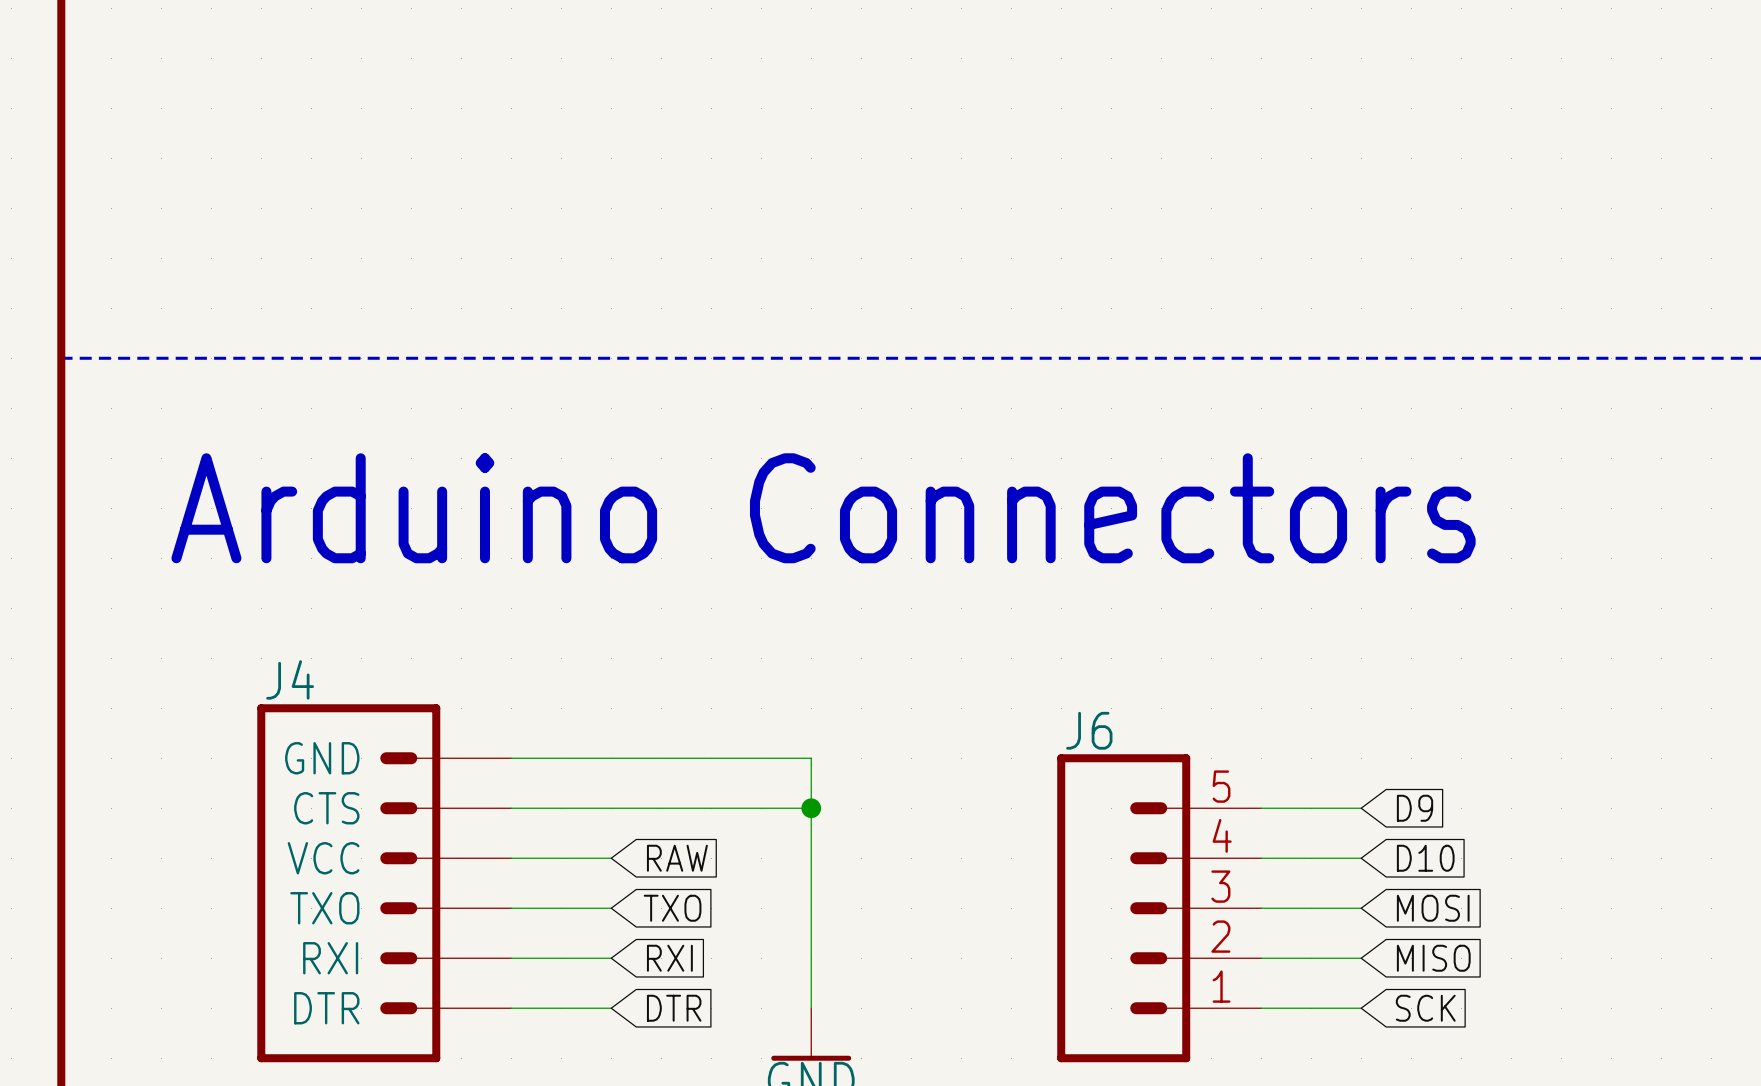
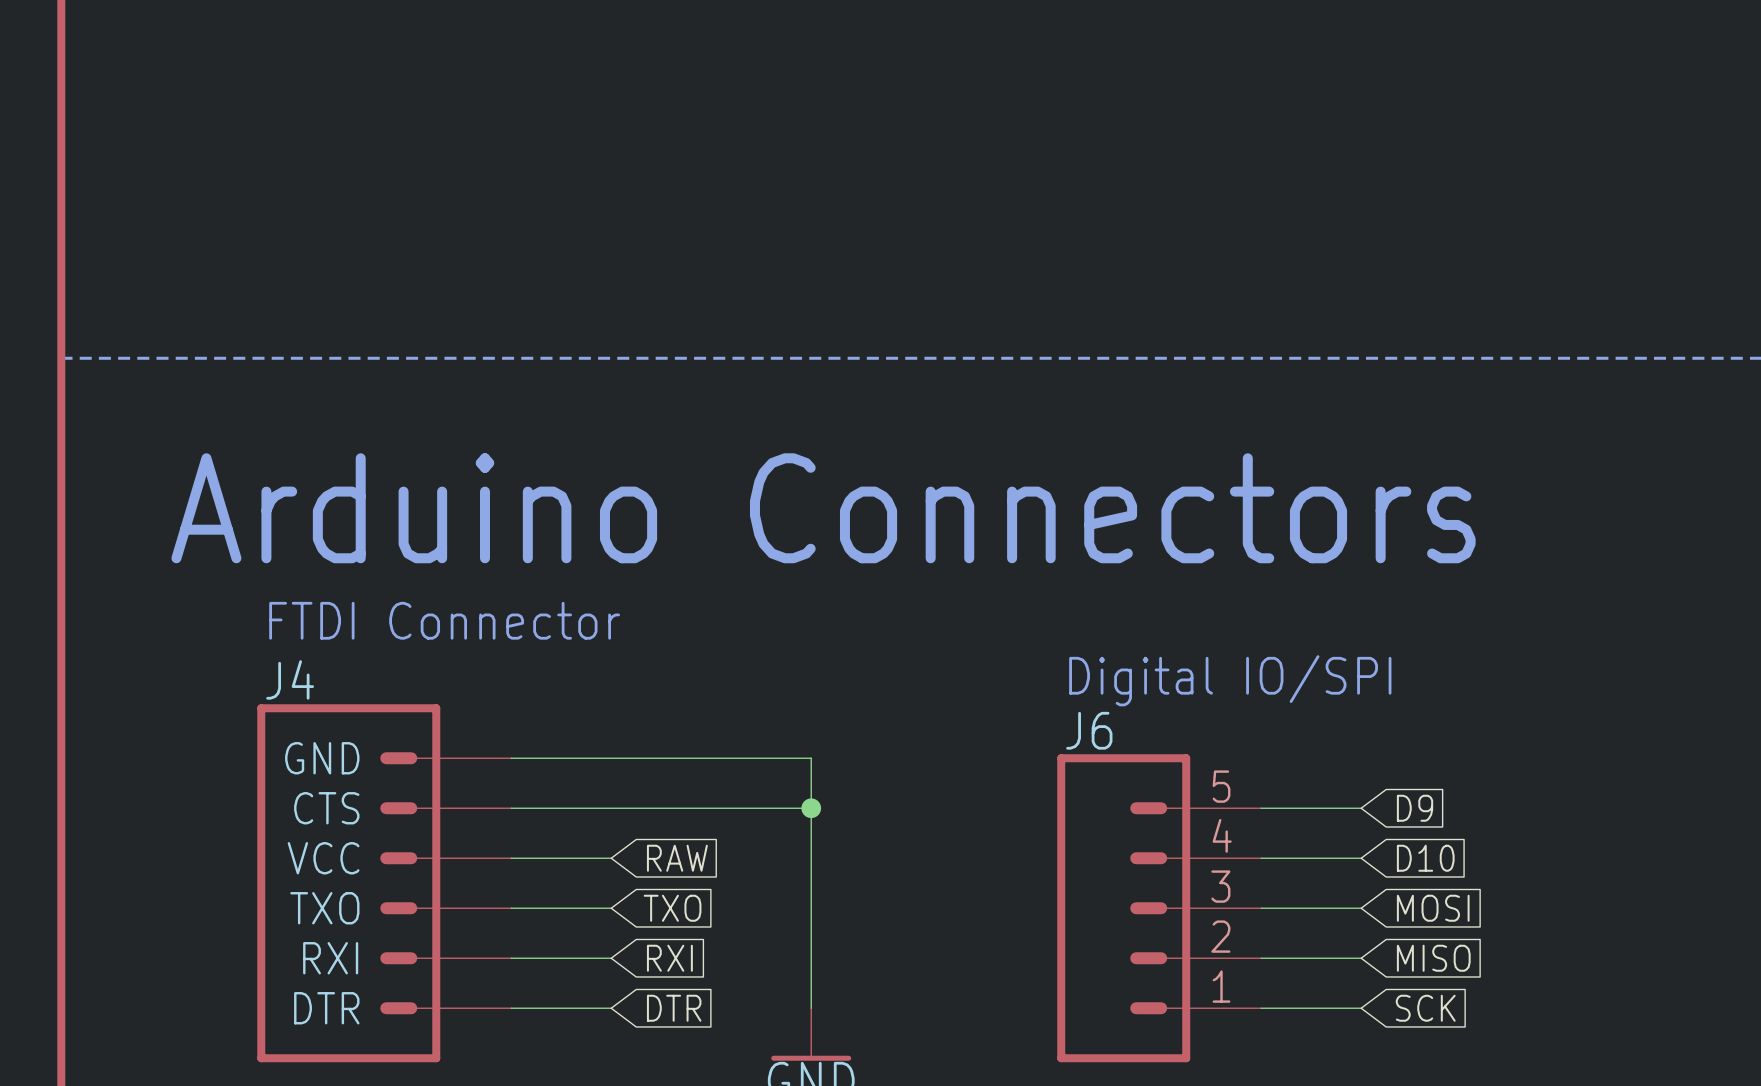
text: none -> FTDI Connector (444, 620)
text: none -> Digital IO/SPI (1230, 680)

